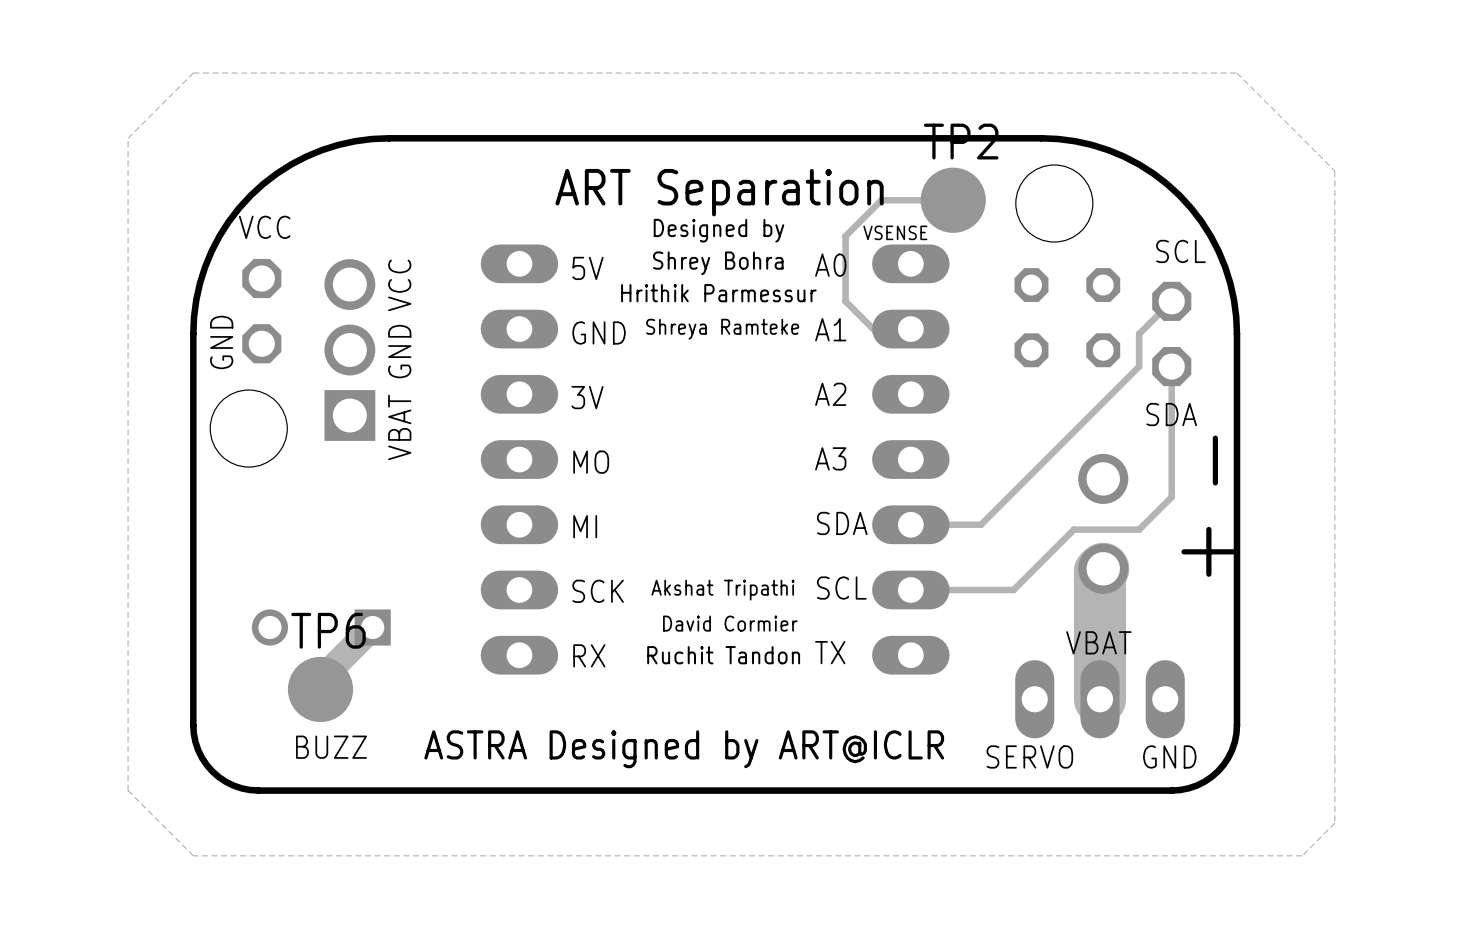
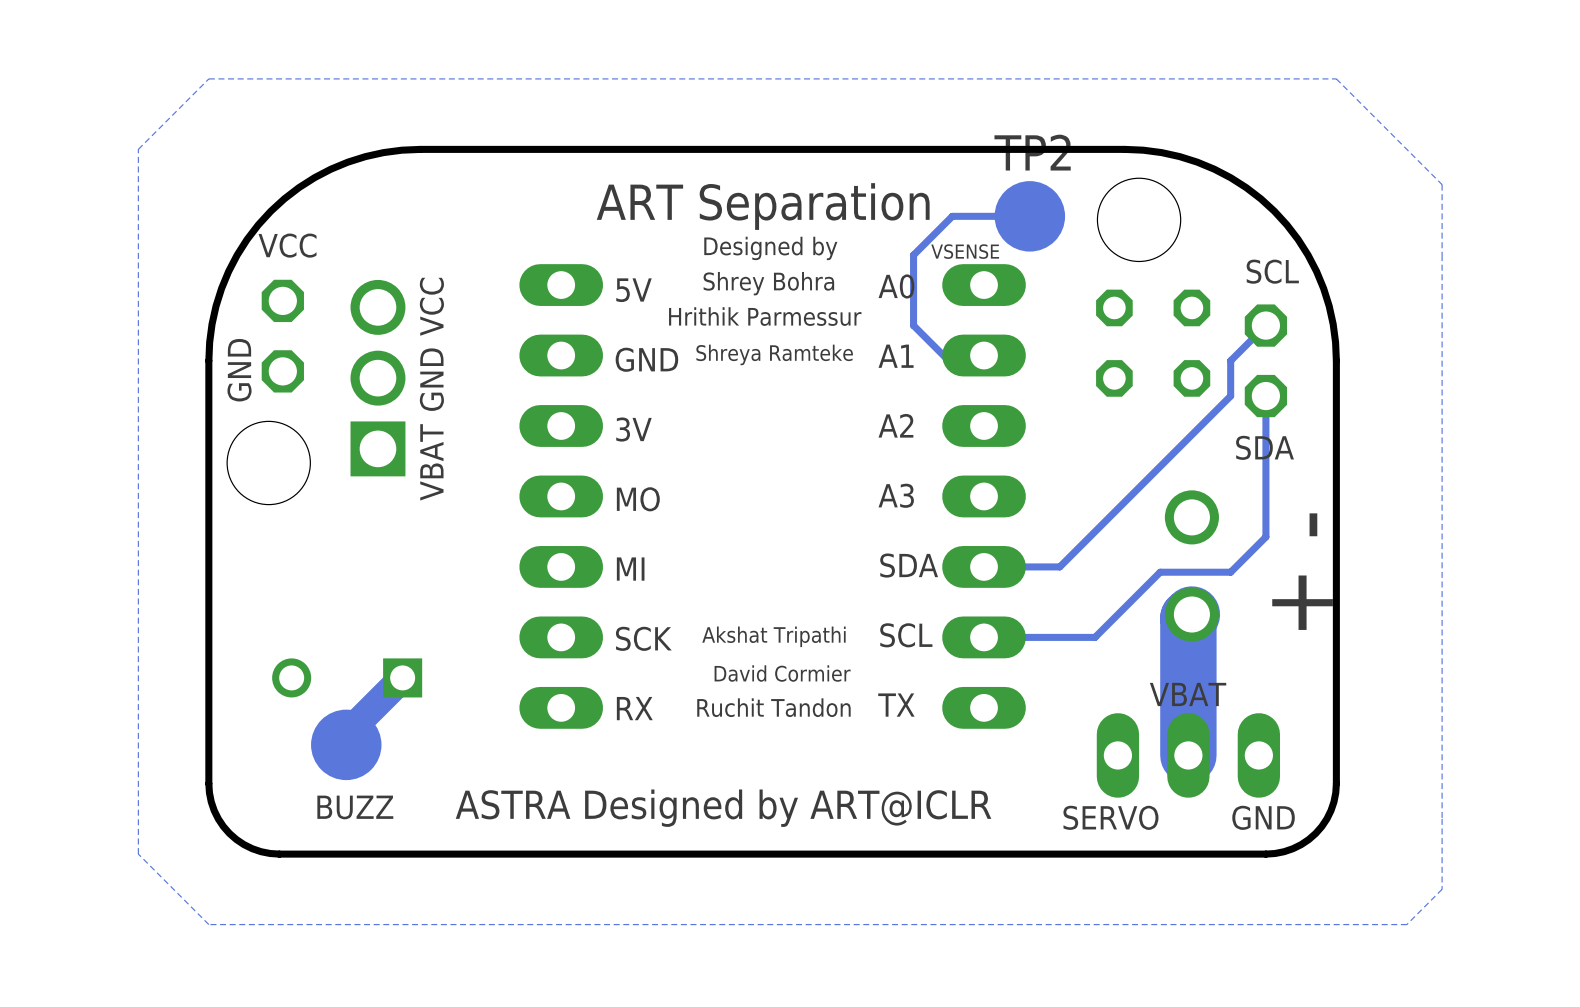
TP6 name: TP6 (328, 630) -> none

